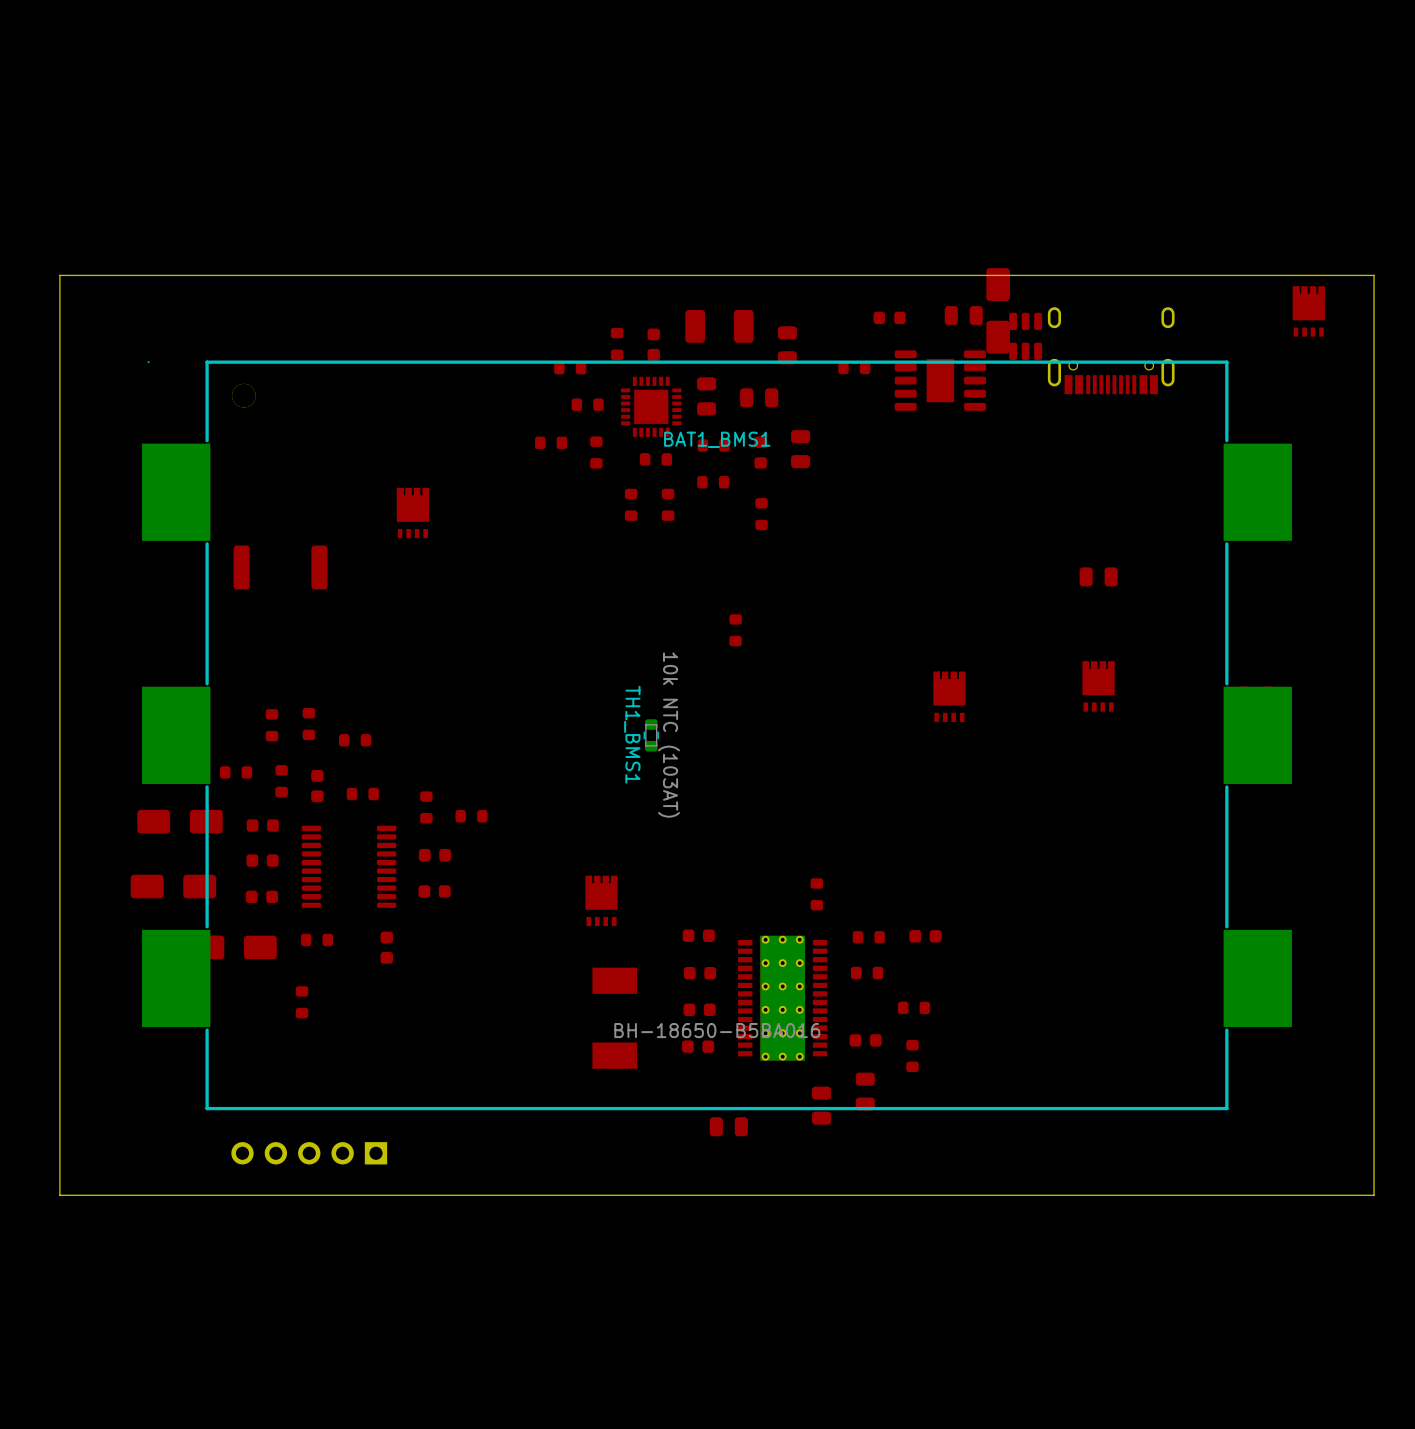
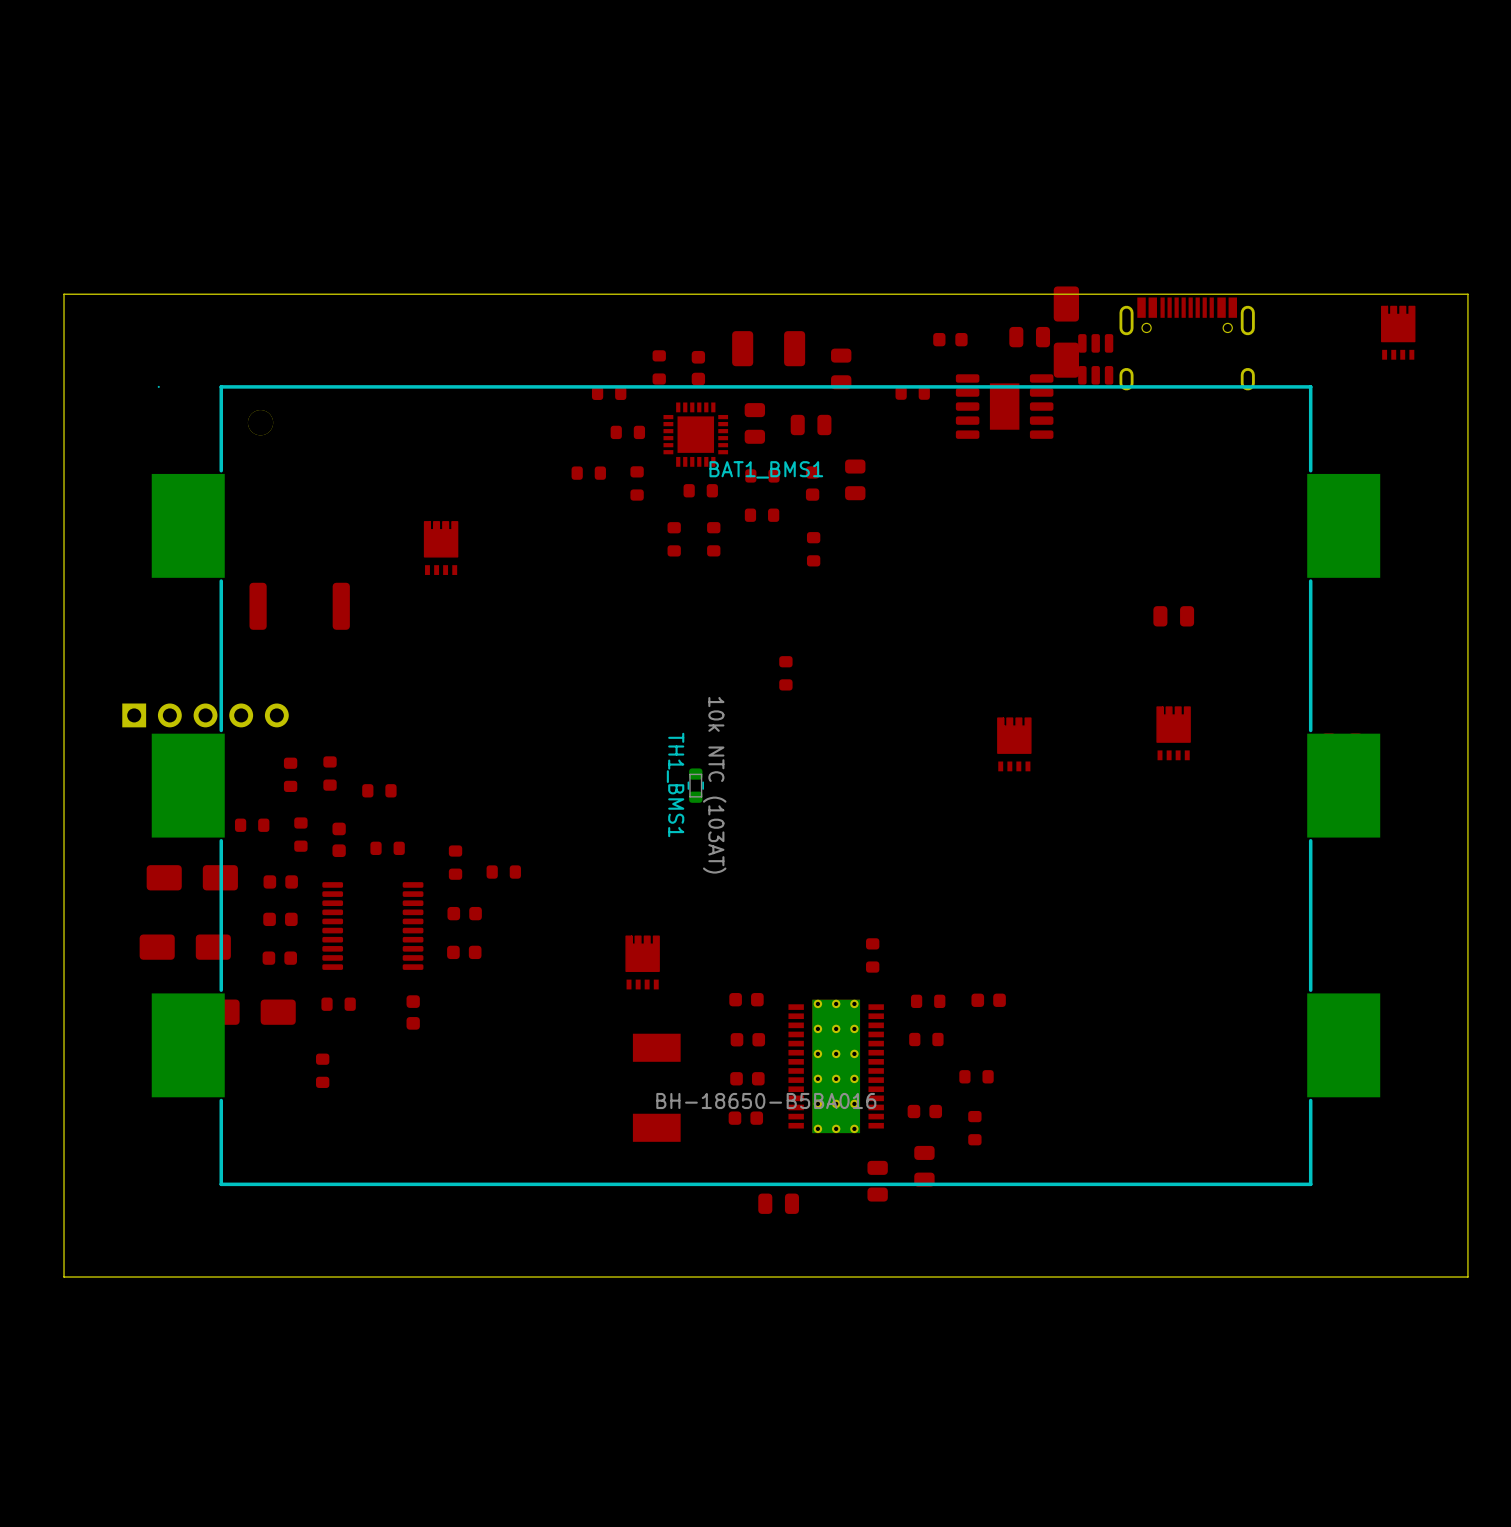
part rotation: 0° (1111, 350) -> 180° (1187, 343)
part: none -> (205, 715)
part: (309, 1153) -> none

